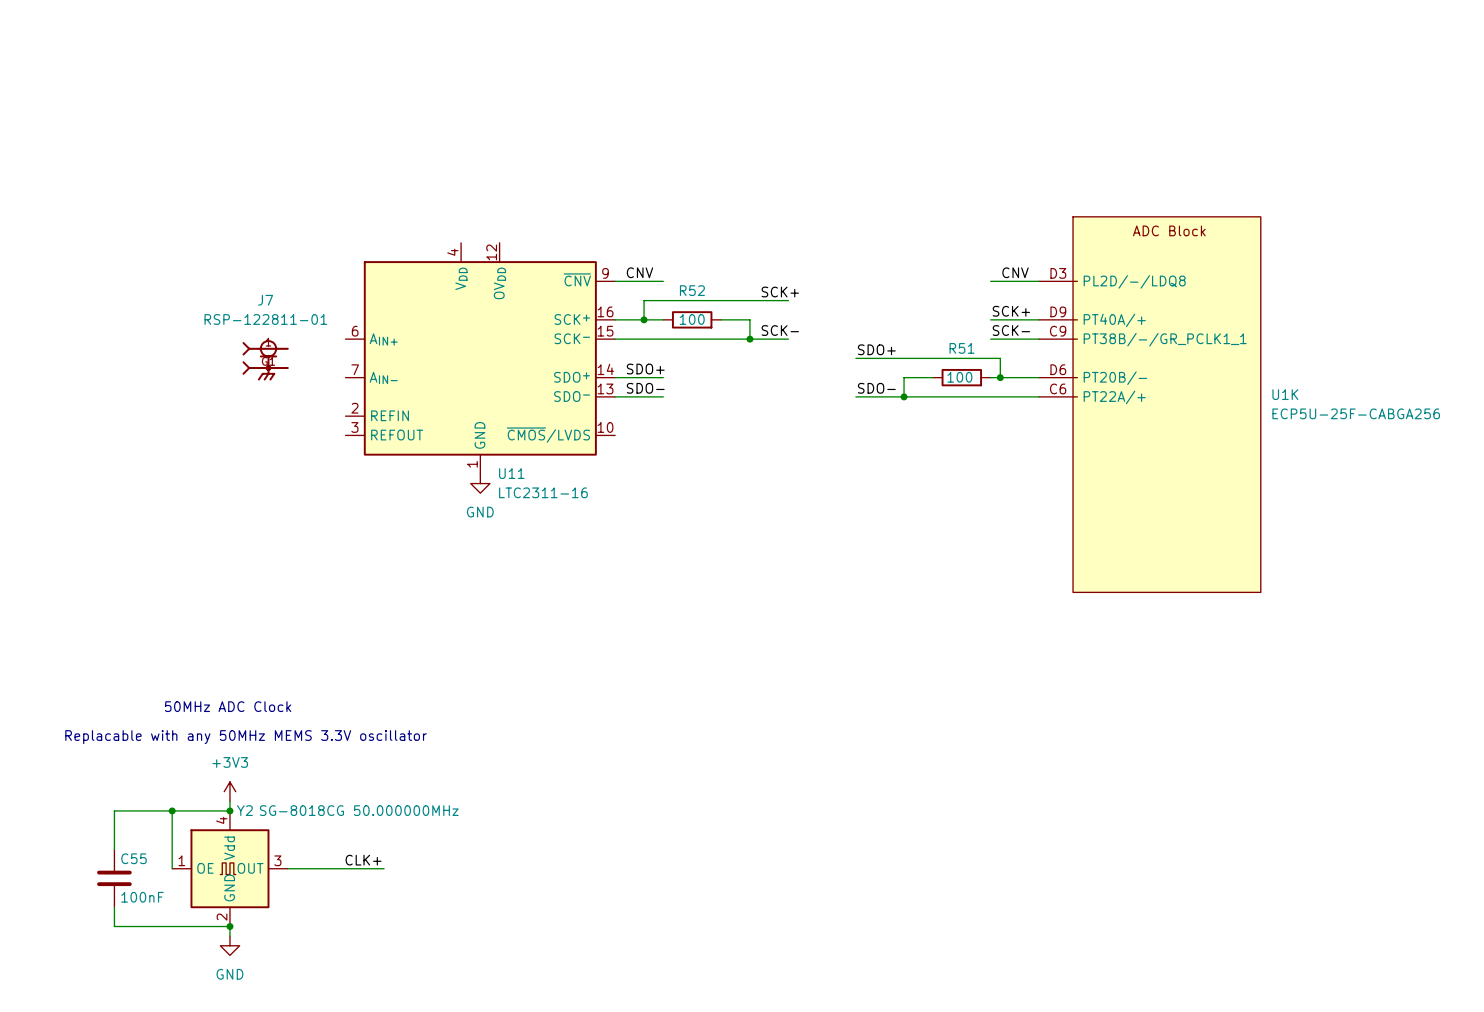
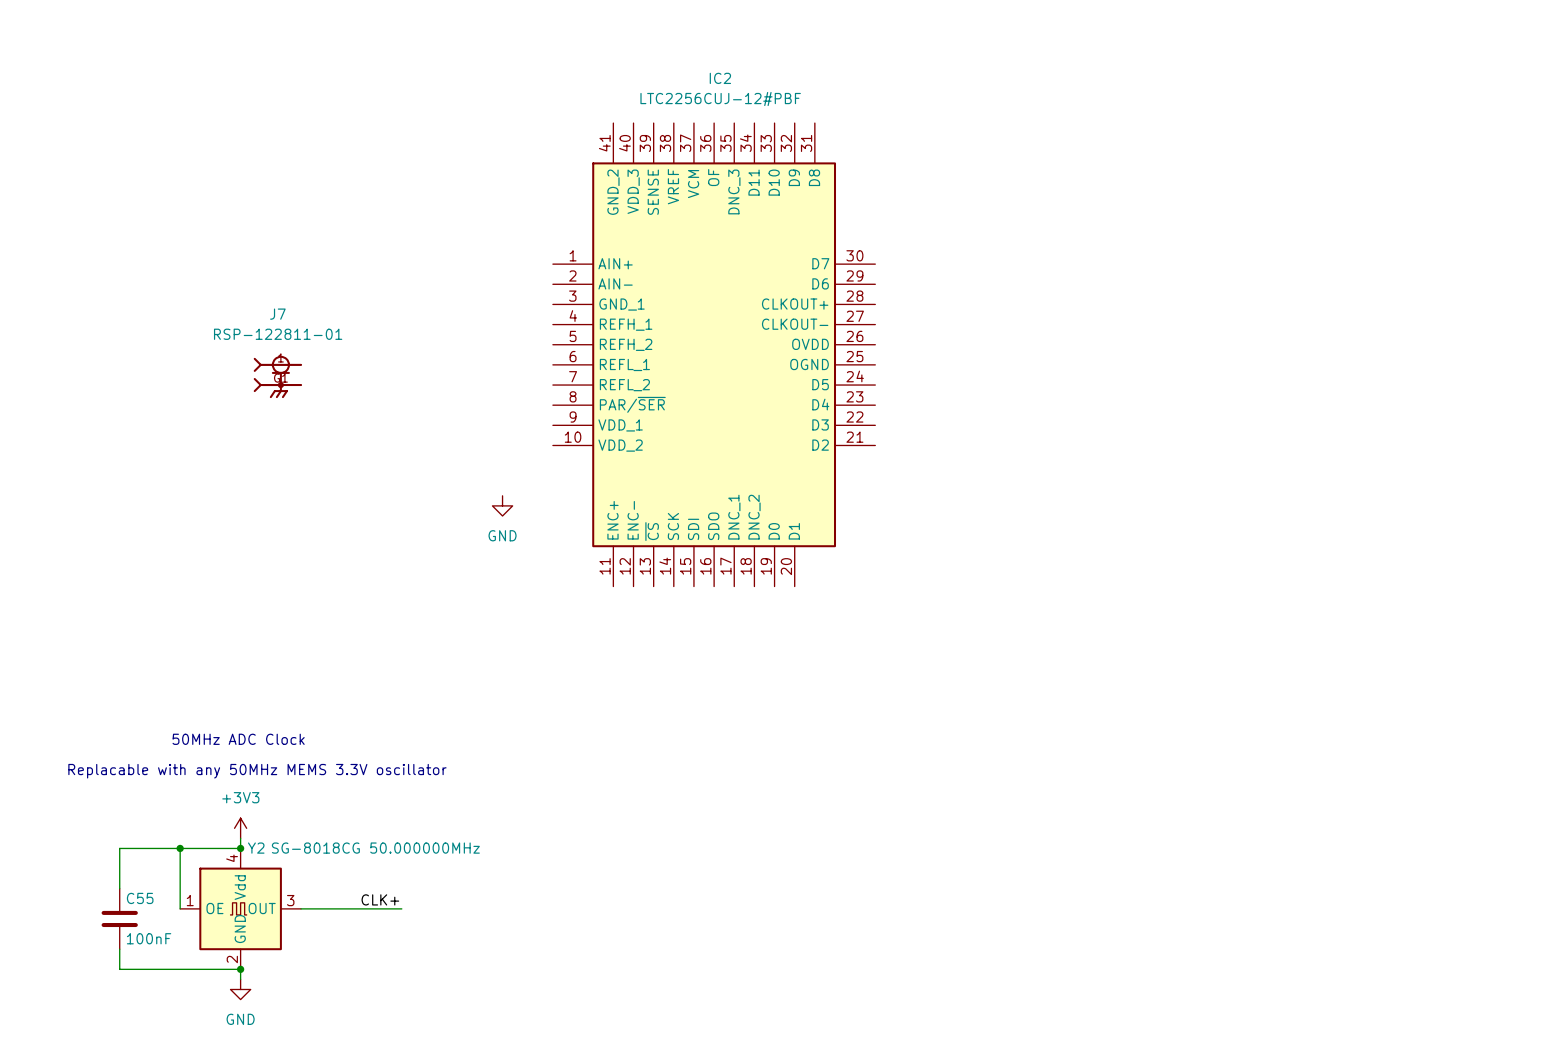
label: CNV (639, 272) -> none
label: CNV (1015, 272) -> none
wire: (990, 281) (1038, 281) -> none
label: SCK+ (780, 292) -> none
label: SCK+ (1011, 311) -> none
junction: (644, 319) -> none
R52: 100 (692, 319) -> none
wire: (990, 319) (1038, 319) -> none
label: SCK- (780, 330) -> none
label: SCK- (1011, 330) -> none
IC2: none -> LTC2256CUJ-12#PBF (714, 354)
junction: (749, 339) -> none
wire: (990, 339) (1038, 339) -> none
label: SDO+ (876, 349) -> none
U11: LTC2311-16 (480, 358) -> none
wire: (855, 358) (1000, 358) (1000, 377) -> none
label: SDO+ (645, 369) -> none
wire: (932, 377) (904, 377) (904, 396) -> none
R51: 100 (961, 377) -> none
wire: (990, 377) (1038, 377) -> none
junction: (1000, 377) -> none
label: SDO- (645, 388) -> none
label: SDO- (876, 388) -> none
wire: (855, 396) (1038, 396) -> none
junction: (904, 396) -> none
U1K: ECP5U-25F-CABGA256 (1149, 404) -> none

